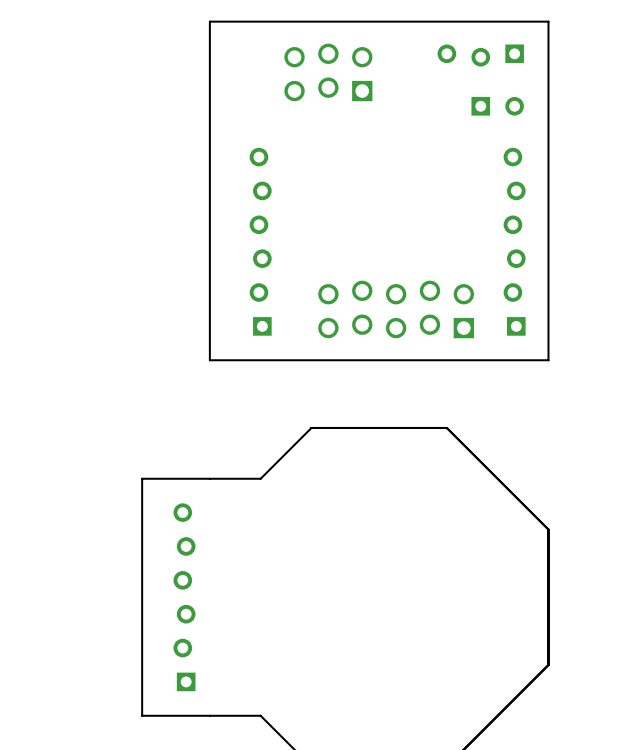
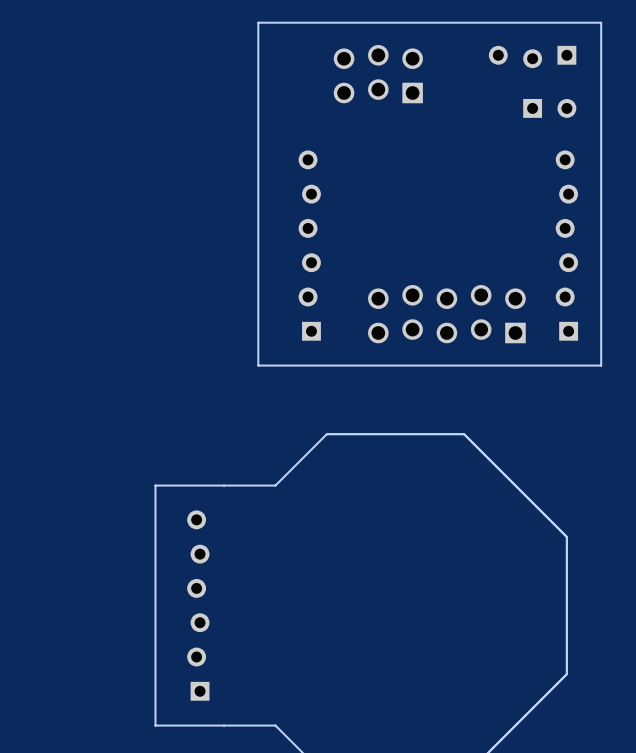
board edge: (243, 21) (209, 21) (209, 360) (243, 360) -> (258, 22) (258, 365)
board edge: (548, 21) (548, 360) -> (566, 22) (601, 22) (601, 365) (566, 365)
part position: (480, 55) -> (532, 57)
part position: (328, 72) -> (378, 74)
part position: (497, 106) -> (549, 108)
part position: (260, 241) -> (309, 245)
part position: (514, 241) -> (566, 245)
part position: (396, 309) -> (446, 314)

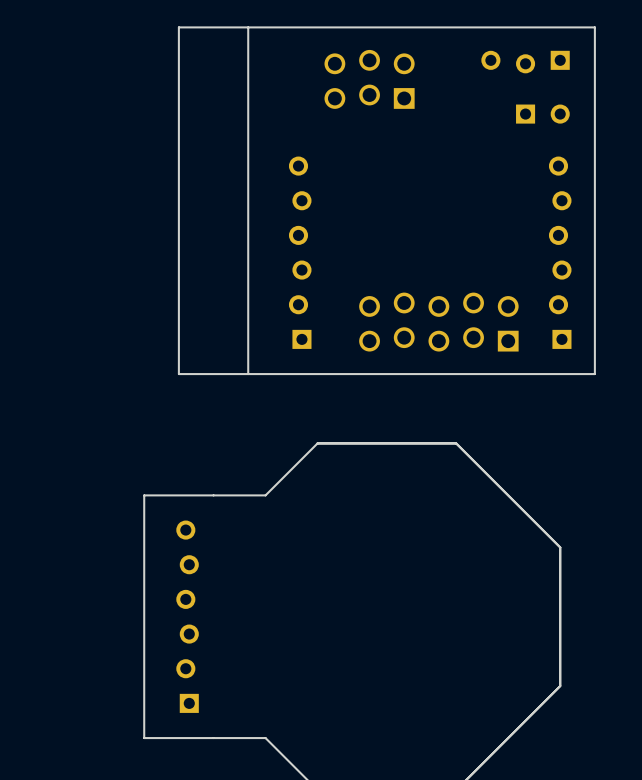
board edge: none -> (248, 27) (178, 27) (178, 374) (248, 374)

